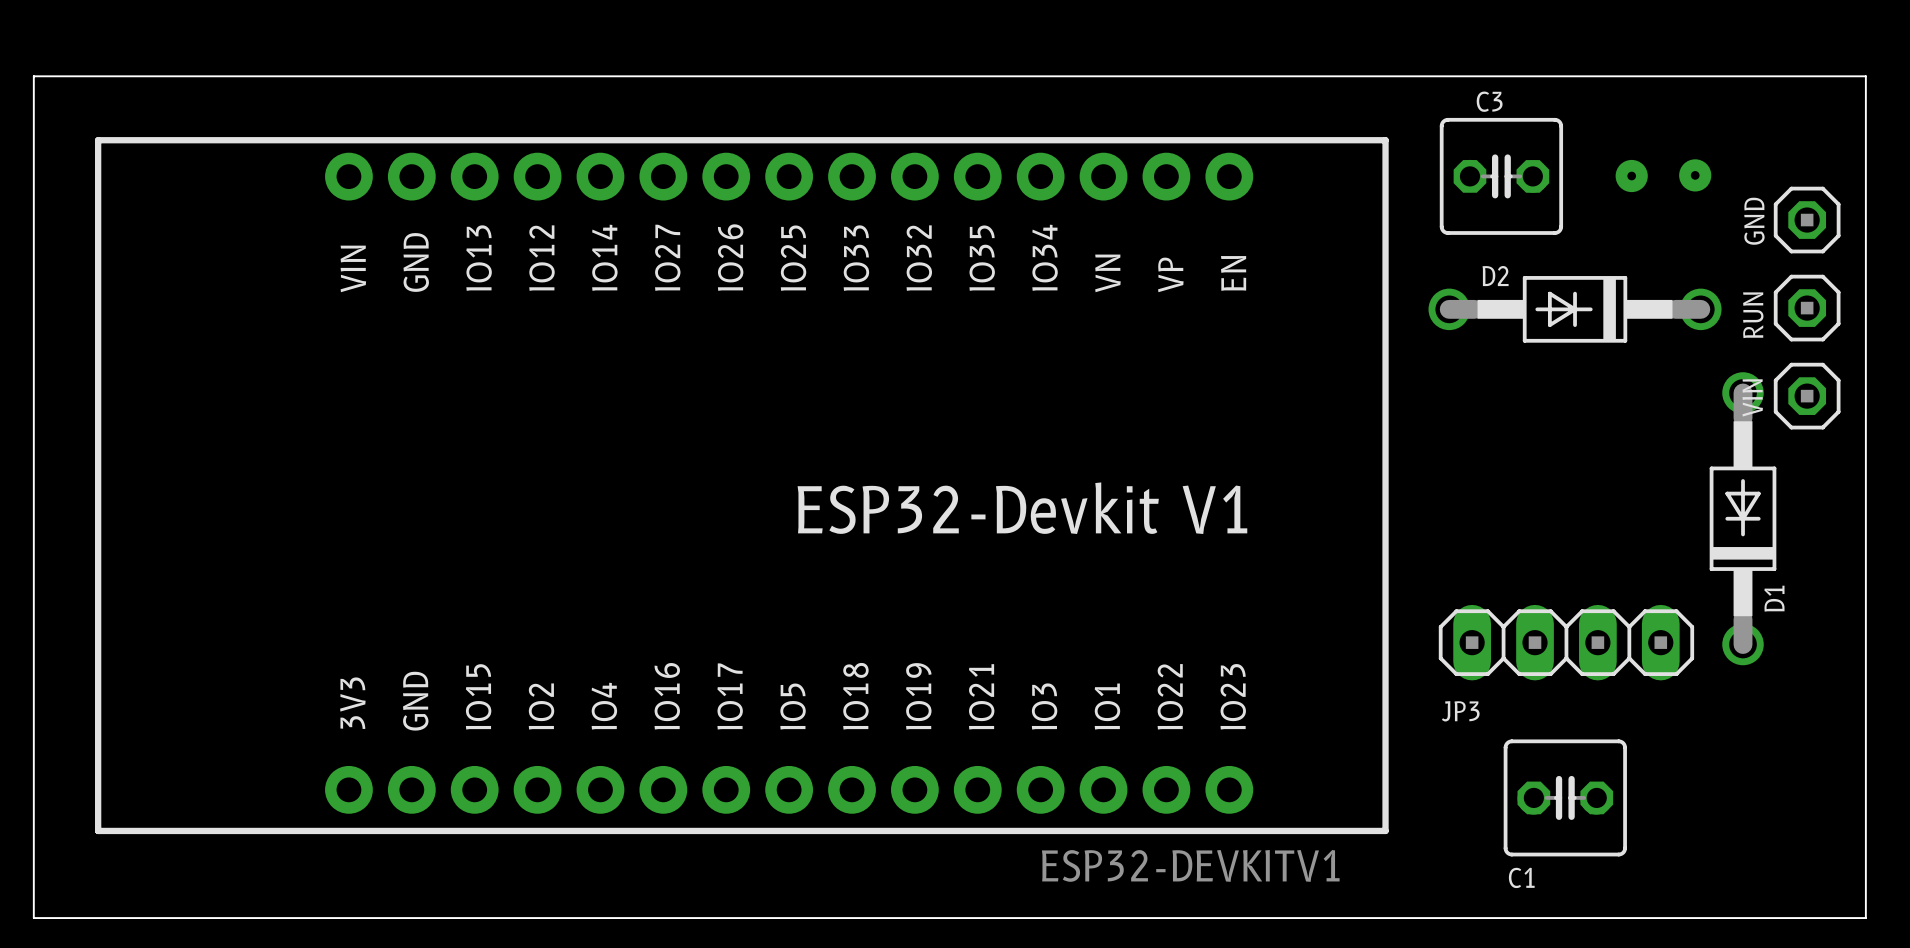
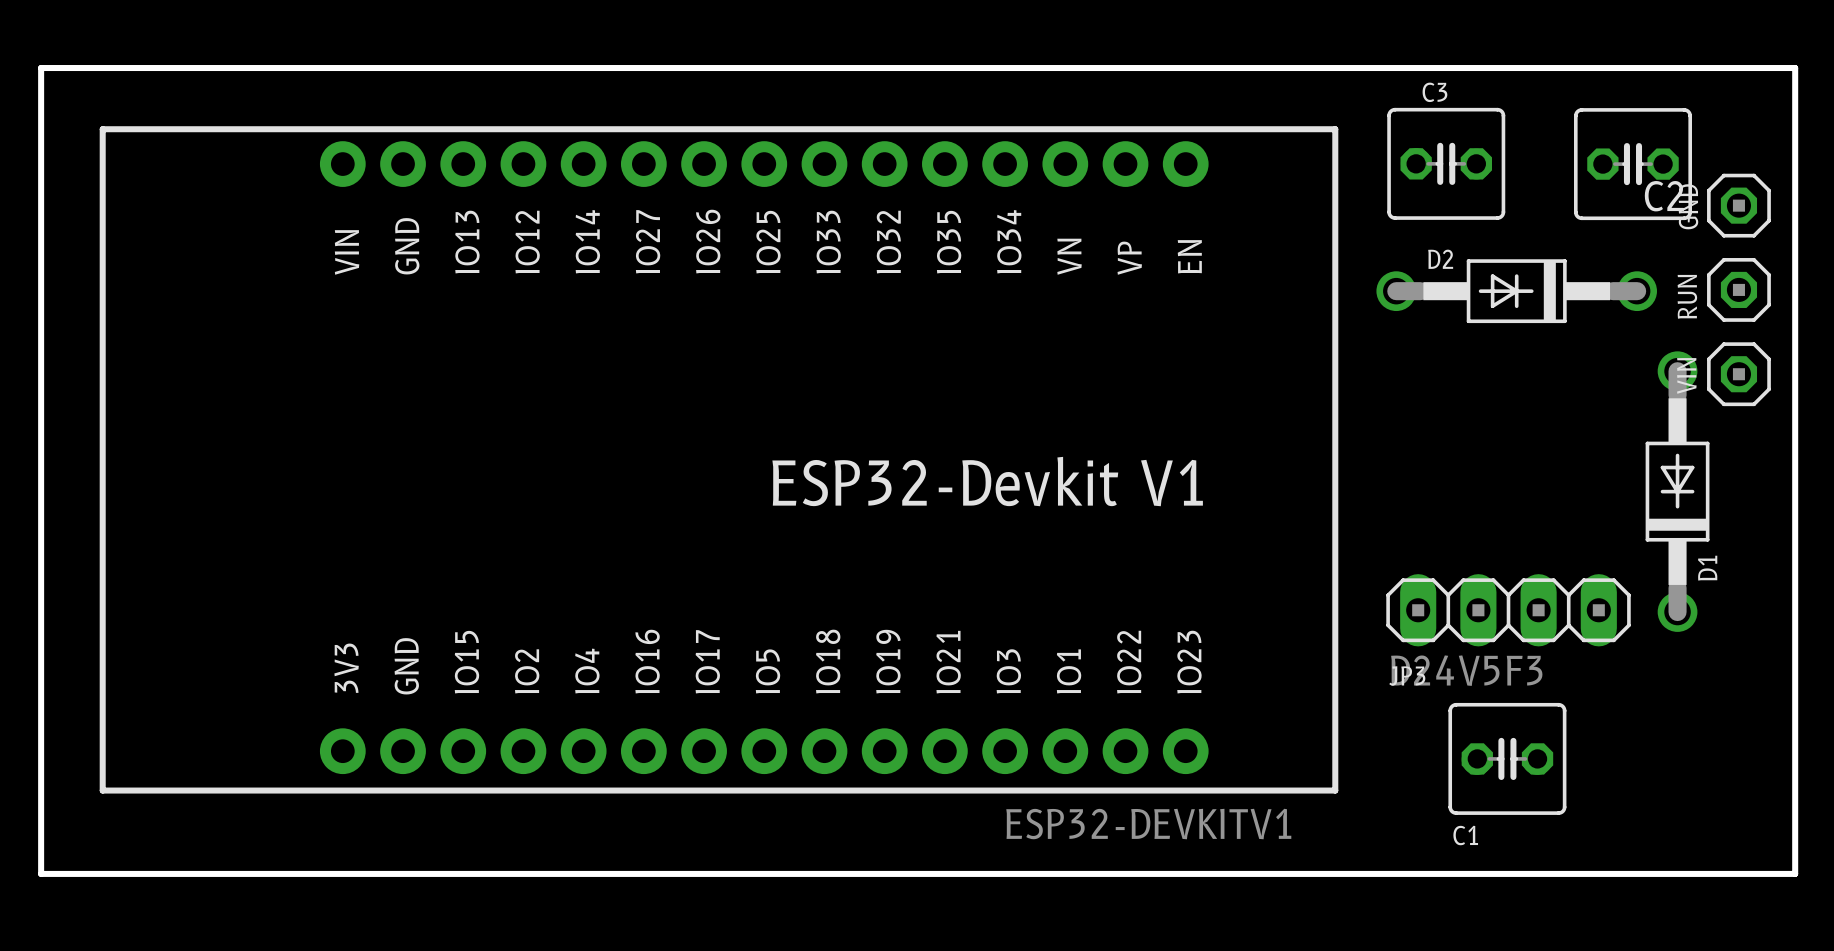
board edge width: thin (33, 76) (1865, 76) (1865, 918) (33, 918) (33, 76) -> thick (41, 68) (1795, 68) (1795, 873) (41, 873) (41, 68)
via: (1695, 175) -> none
via: (1631, 176) -> none
C2: none -> (1632, 164)
JP3 value: none -> D24V5F3 (1466, 670)

